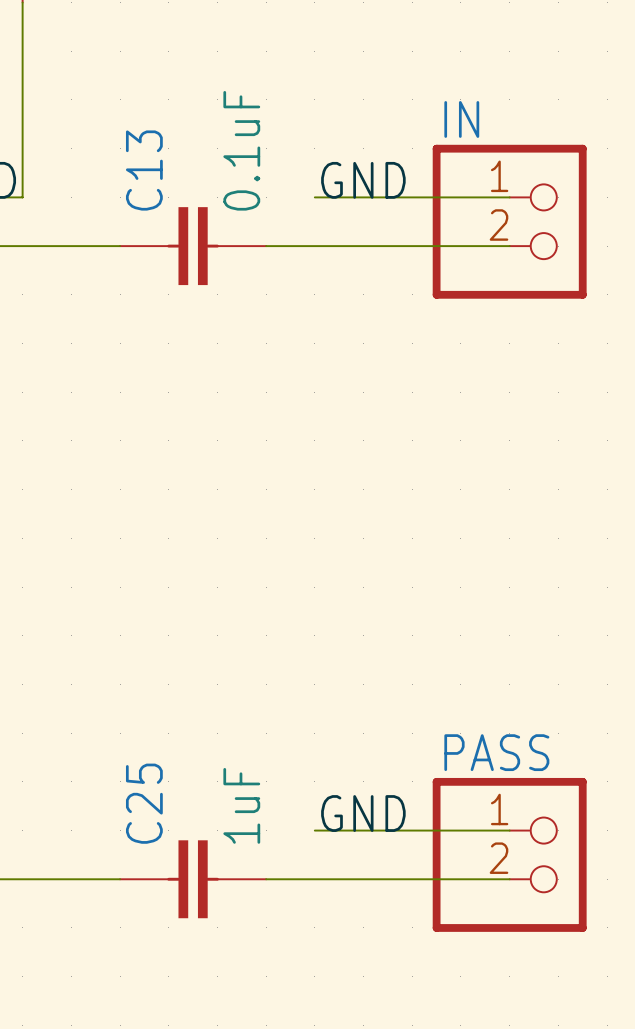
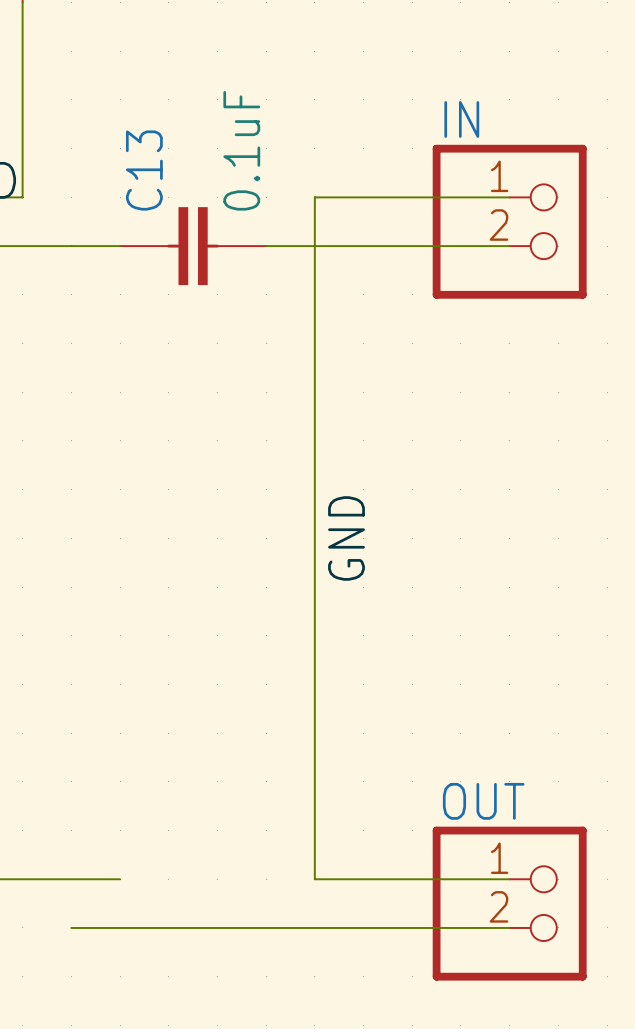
label: GND (363, 180) -> none
label: none -> GND (346, 538)
label: GND (363, 813) -> none
wire: (314, 830) (509, 830) -> none
PASS: (509, 854) -> none
C25: 1uF (193, 879) -> none
wire: (266, 879) (314, 879) -> (314, 197) (314, 879)
OUT: none -> (509, 903)
wire: none -> (71, 927) (509, 927)

